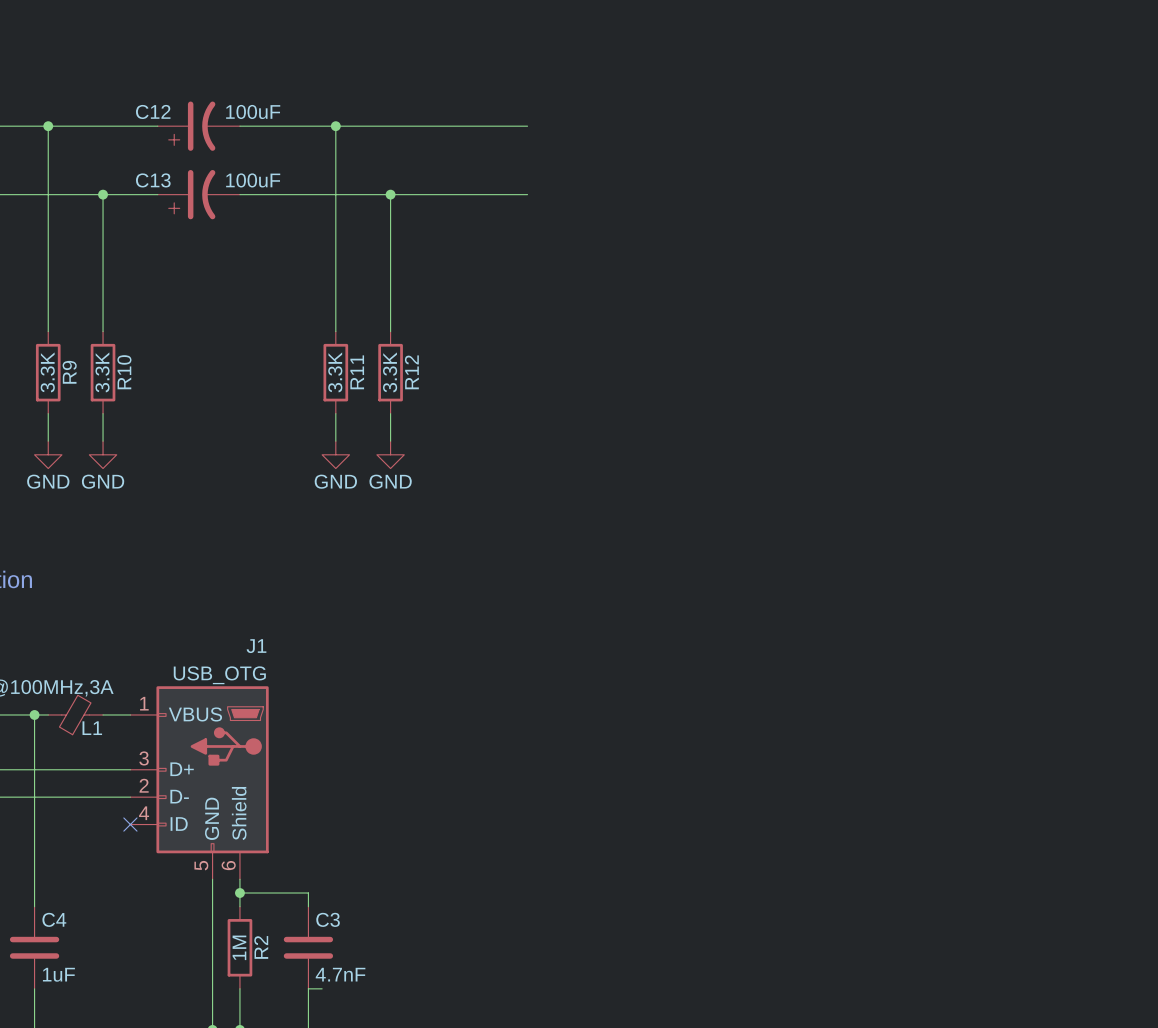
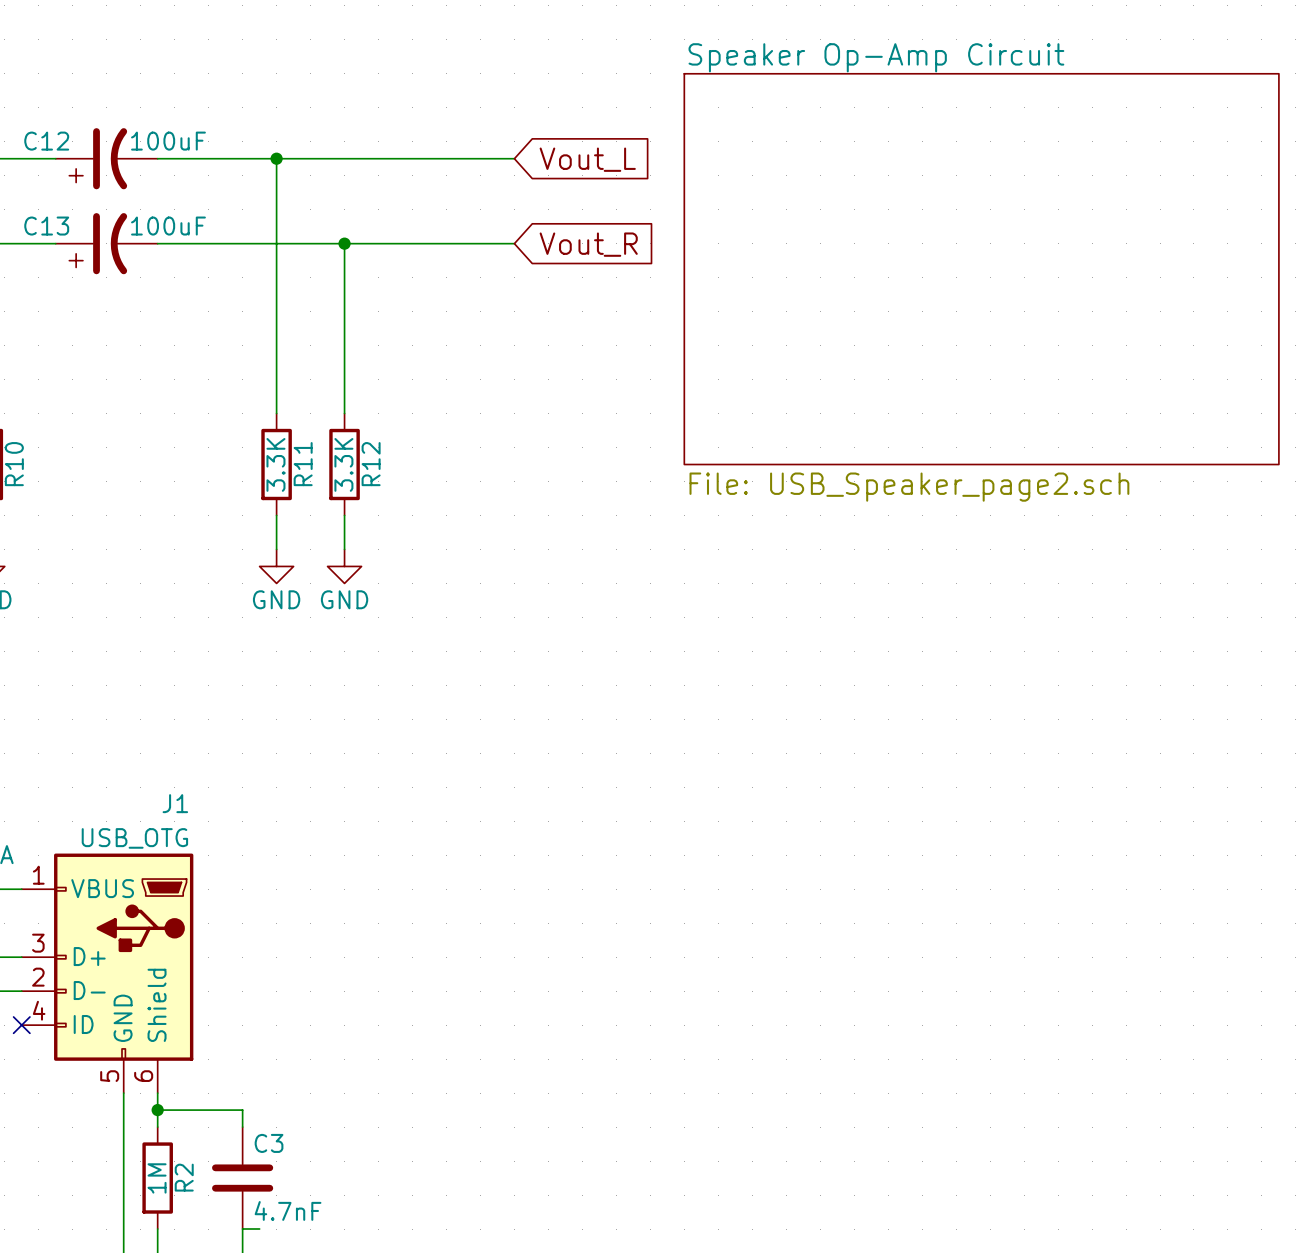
global label: none -> Vout_L (587, 159)
global label: none -> Vout_R (588, 244)
sheet Speaker Op-Amp Circuit: none -> File: USB_Speaker_page2.sch (981, 269)

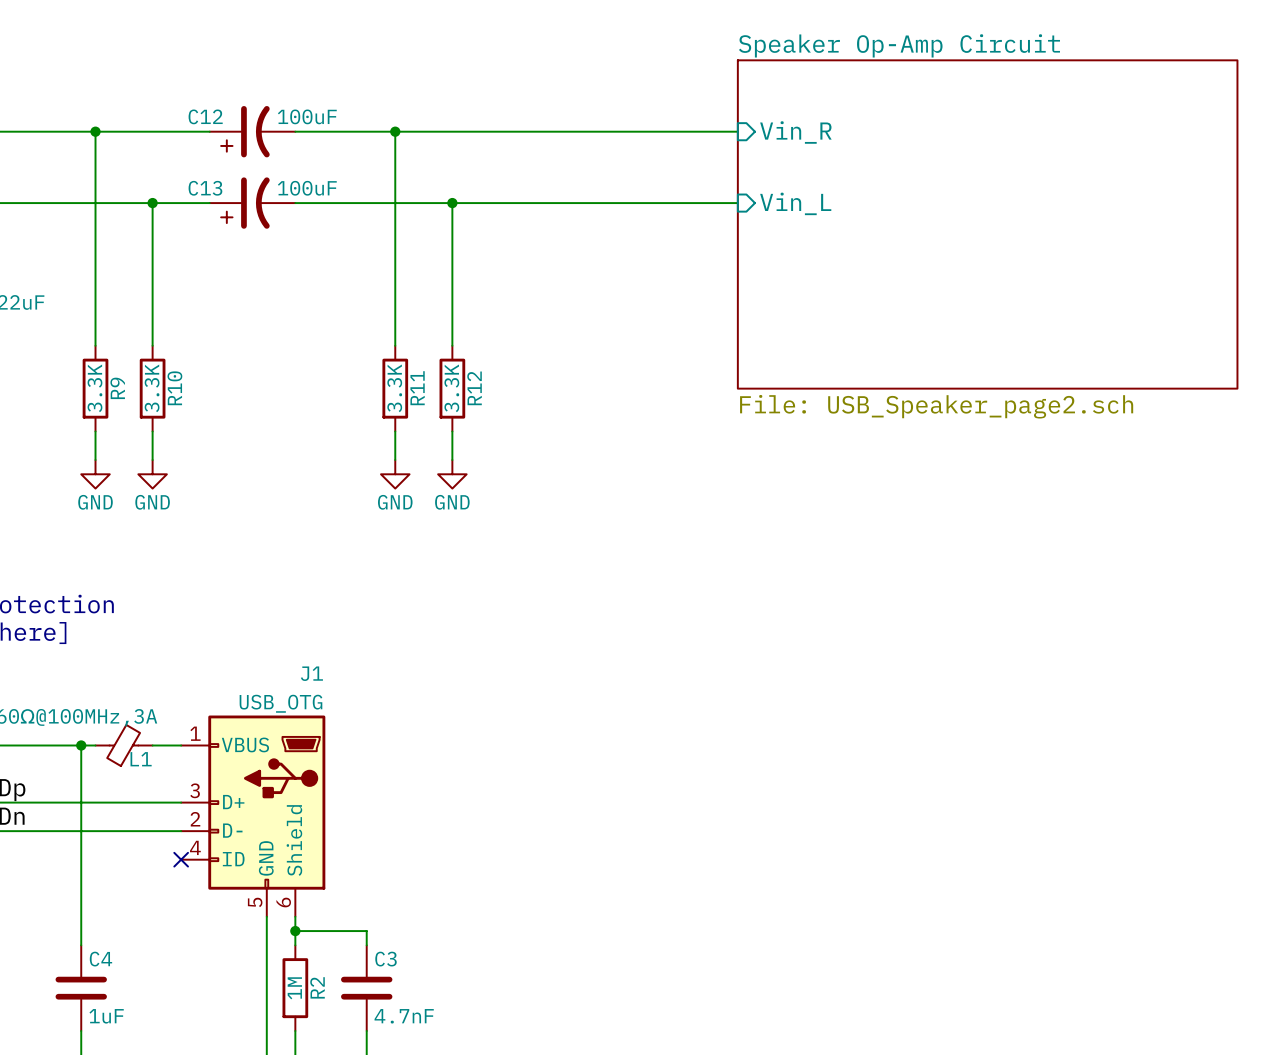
wire: none -> (595, 131) (737, 131)
sheet pin: none -> Vin_R (795, 132)
global label: Vout_L (587, 159) -> none
wire: none -> (595, 203) (737, 203)
sheet pin: none -> Vin_L (795, 203)
global label: Vout_R (588, 244) -> none
wire: (242, 1229) (259, 1229) -> none

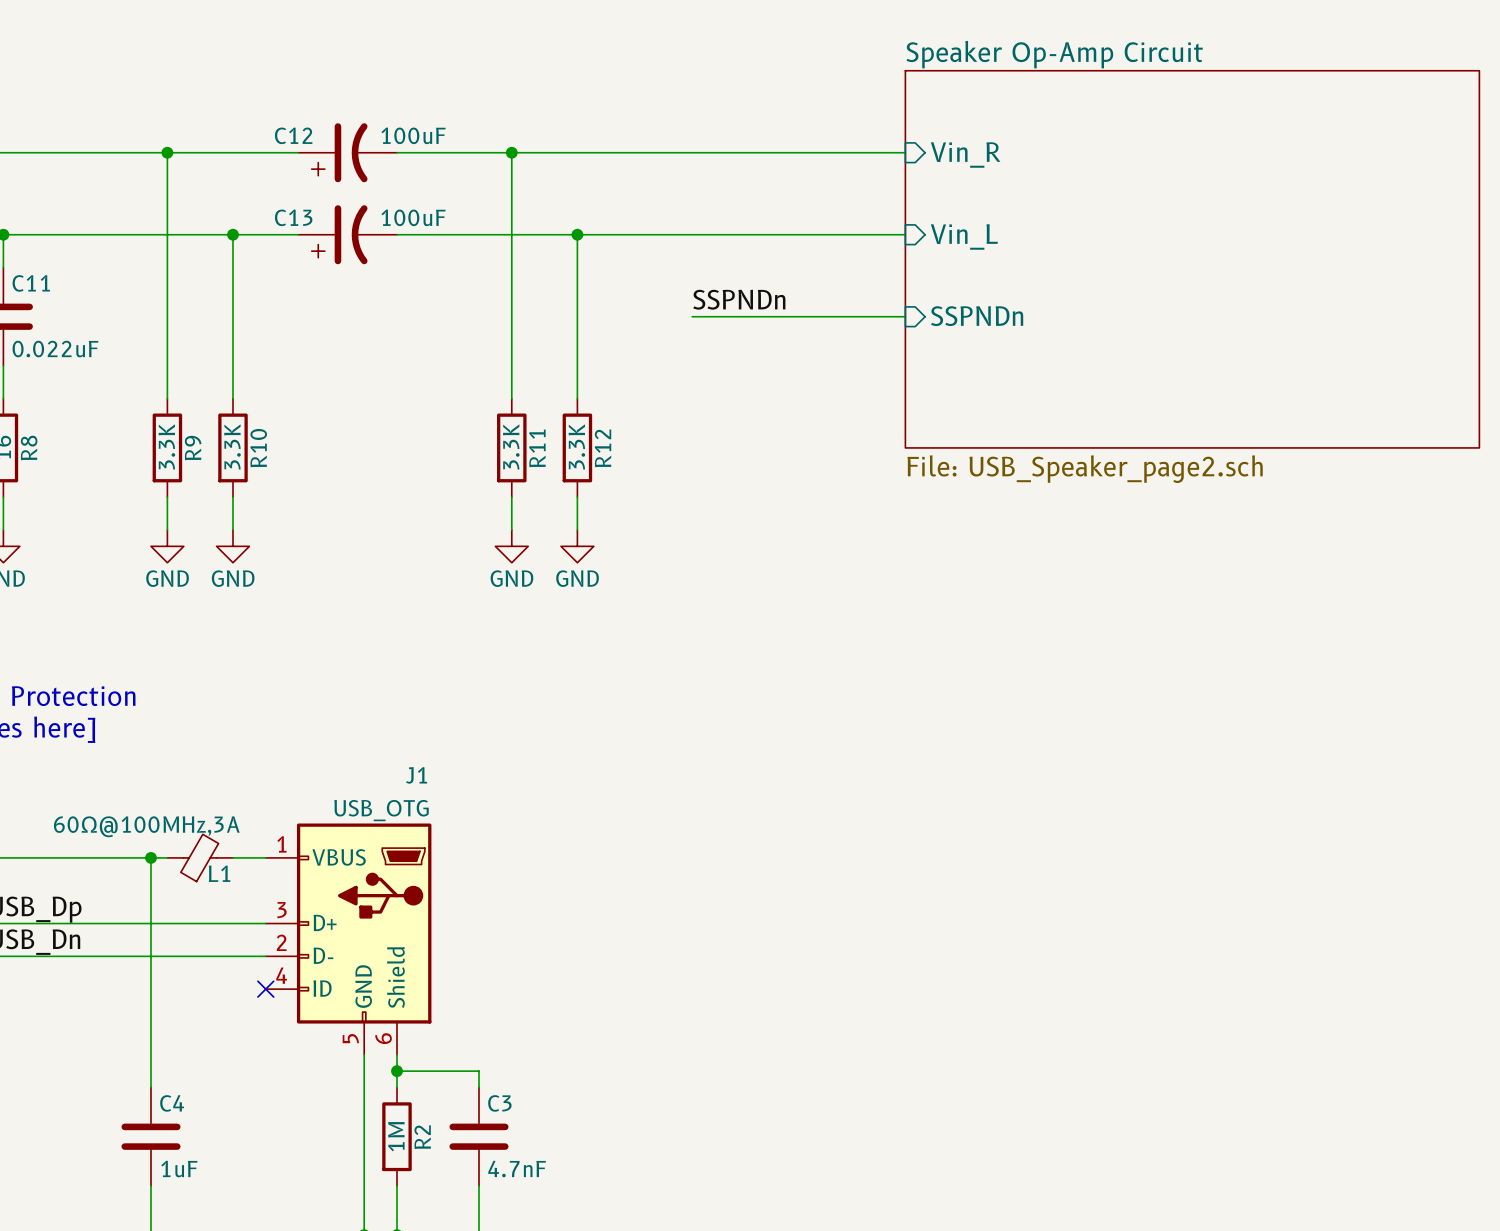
label: none -> SSPNDn (739, 299)
sheet pin: none -> SSPNDn (977, 316)
wire: none -> (692, 316) (905, 316)

